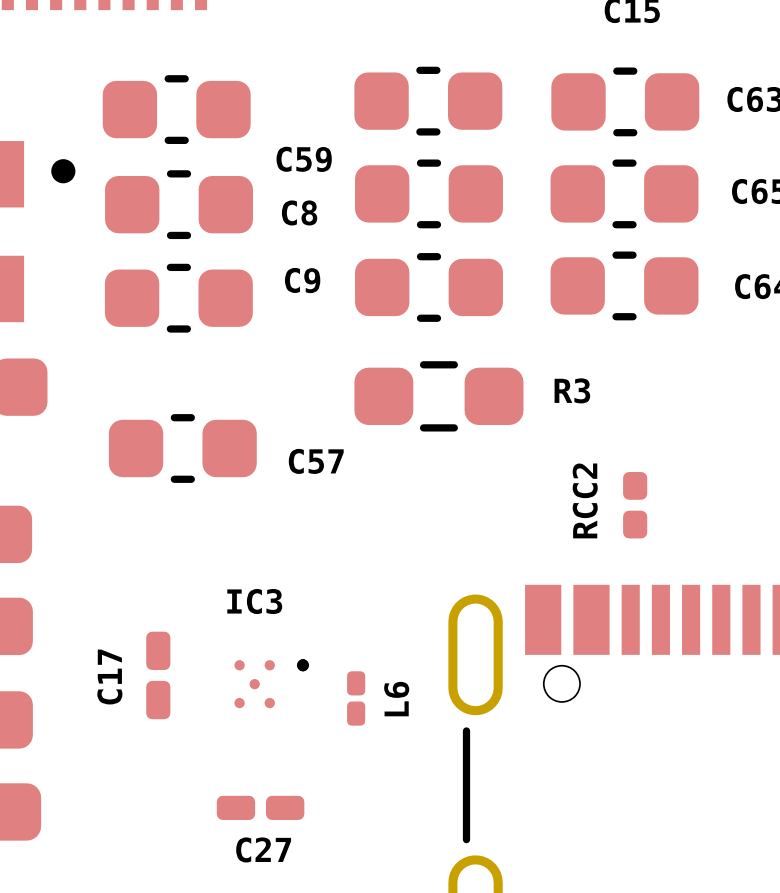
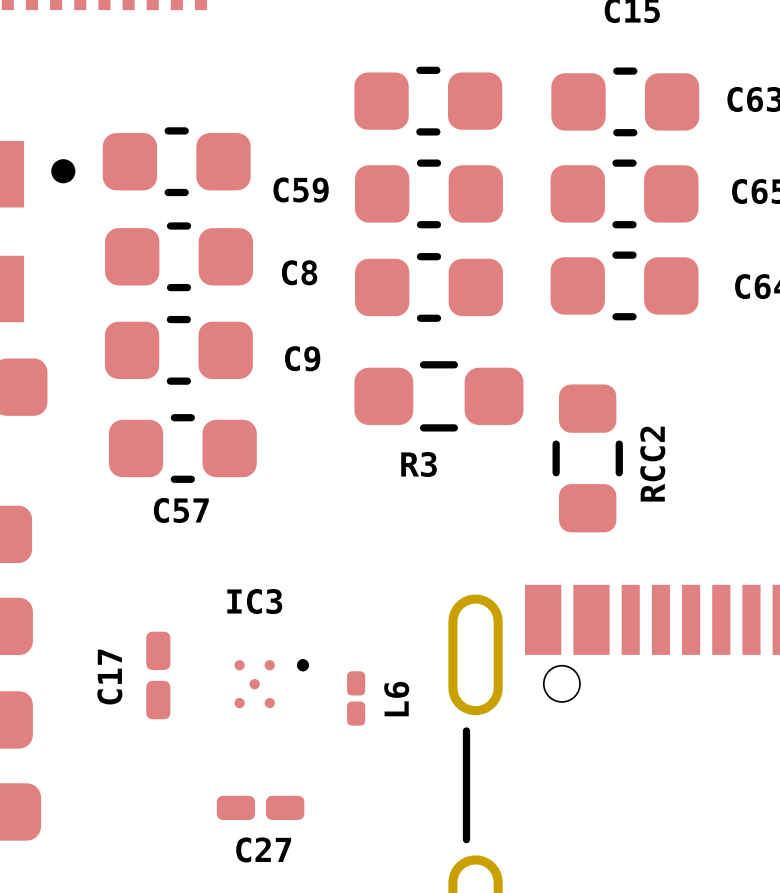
C59 position: (176, 109) -> (176, 161)
C59 name position: C59 (304, 159) -> C59 (301, 190)
C8 position: (179, 204) -> (179, 256)
C8 name position: C8 (299, 212) -> C8 (299, 272)
C9 name position: C9 (302, 280) -> C9 (302, 358)
C9 position: (178, 298) -> (178, 350)
R3 name position: R3 (572, 390) -> R3 (419, 464)
C57 name position: C57 (316, 461) -> C57 (181, 510)
RCC2 footprint: [623, 472, 648, 539] -> [552, 384, 623, 533]

